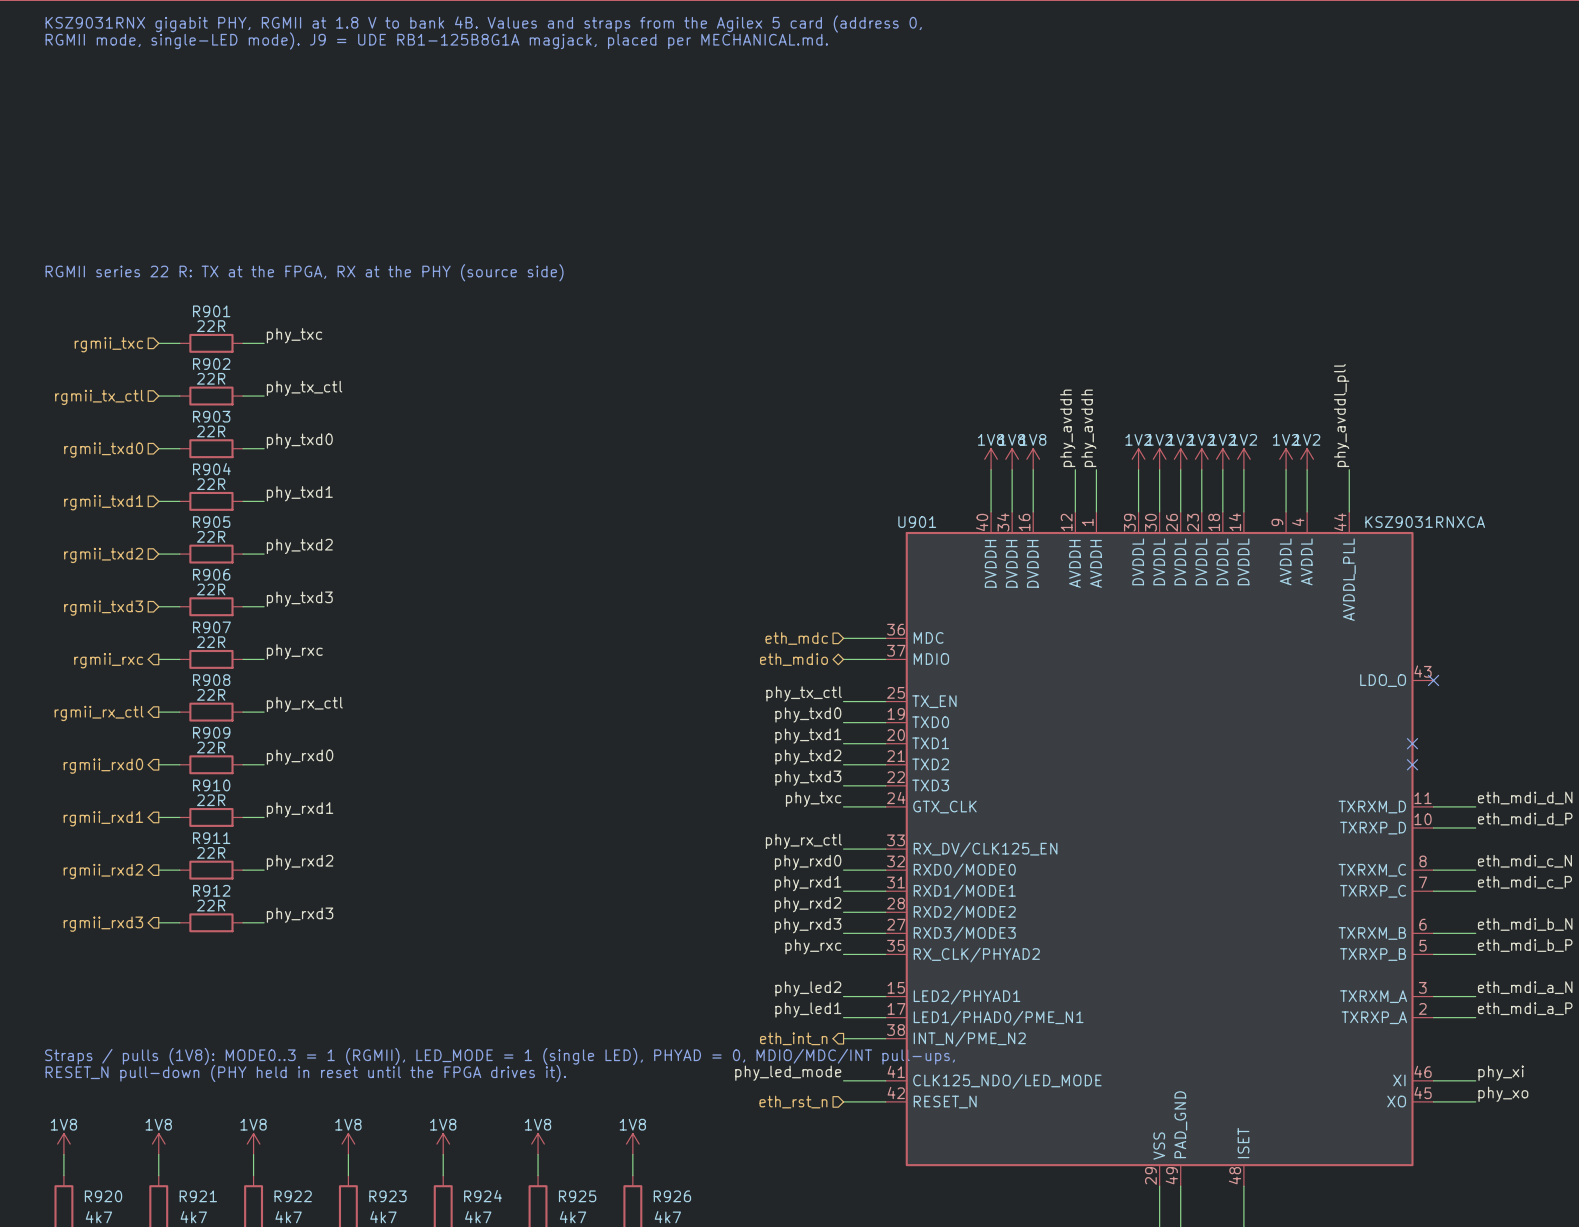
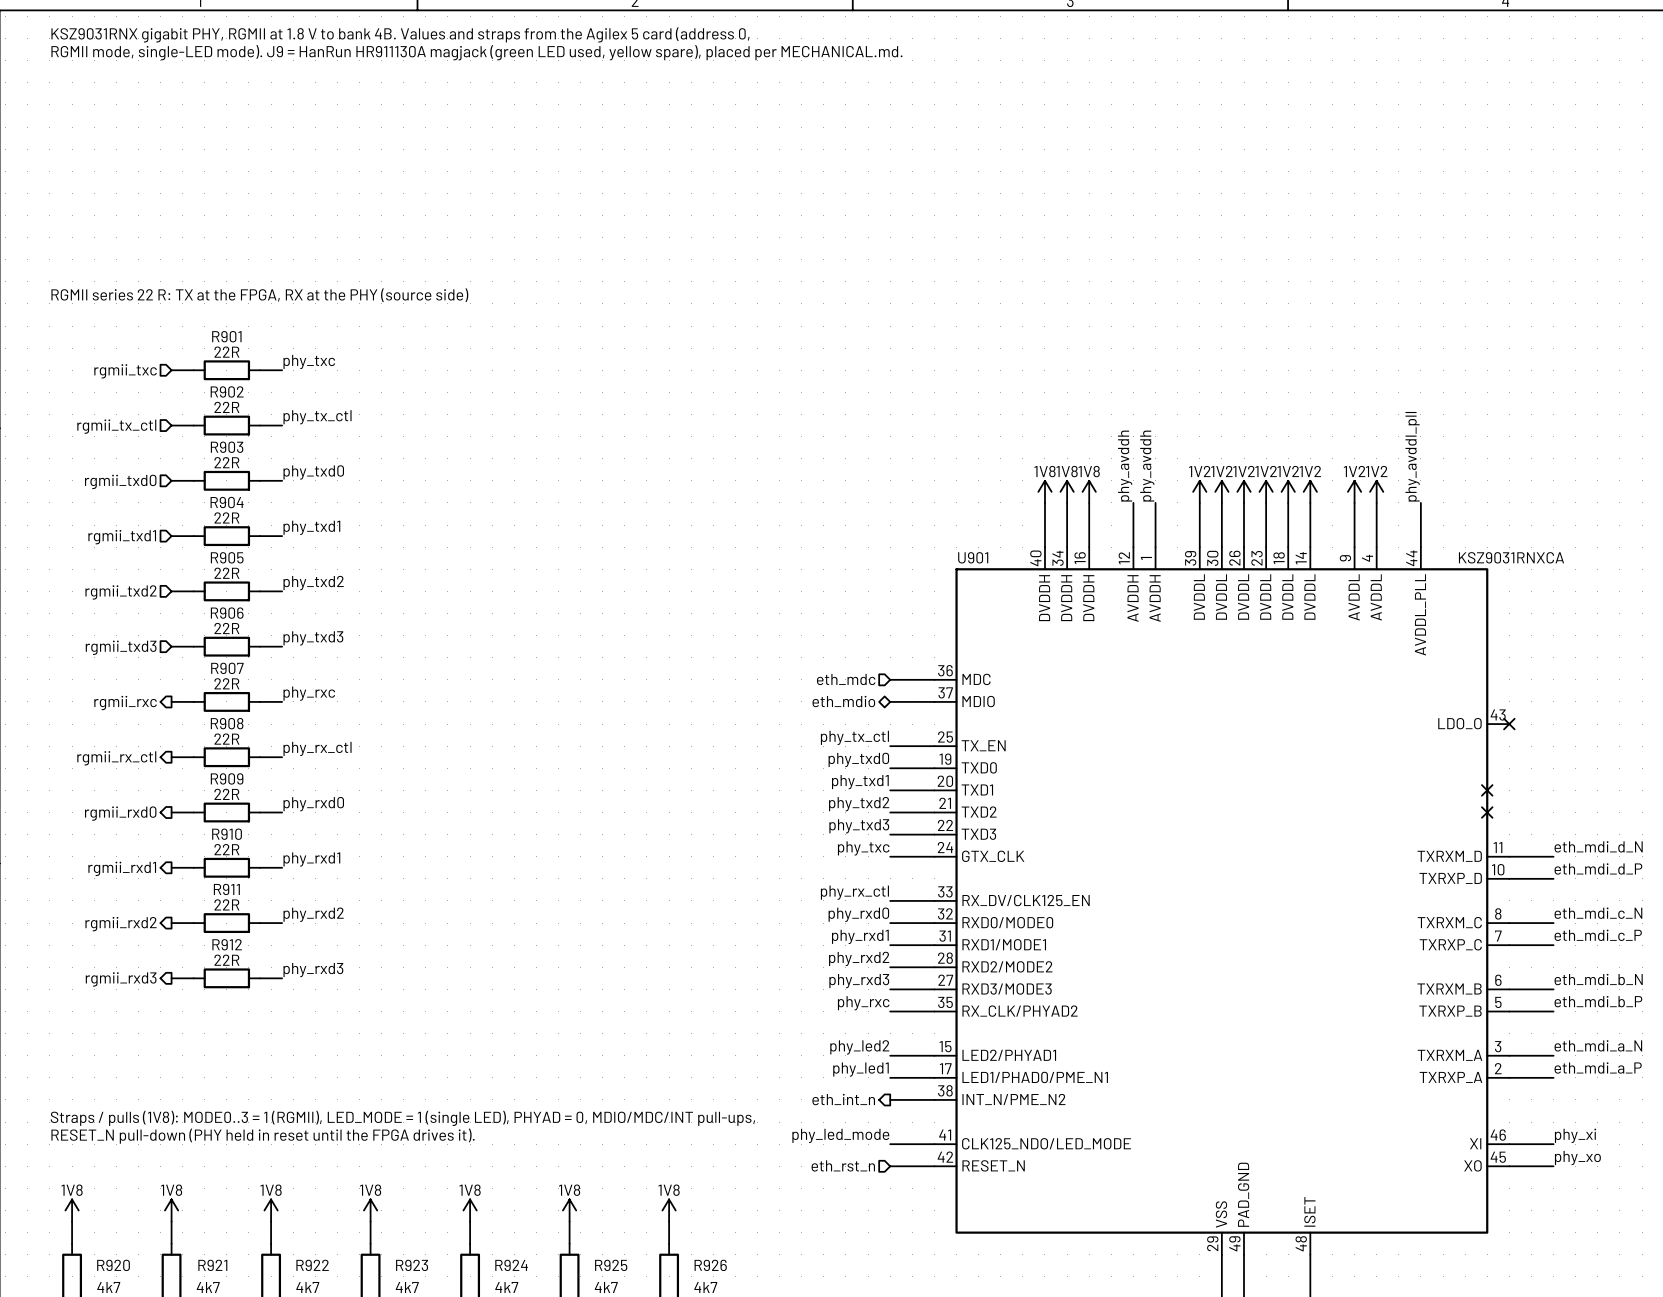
text: RGMII mode, single-LED mode). J9 = UDE RB1-125B8G1A magjack, placed per MECHANICAL.md. (436, 40) -> RGMII mode, single-LED mode). J9 = HanRun HR911130A magjack (green LED used, yellow spare), placed per MECHANICAL.md. (476, 52)

